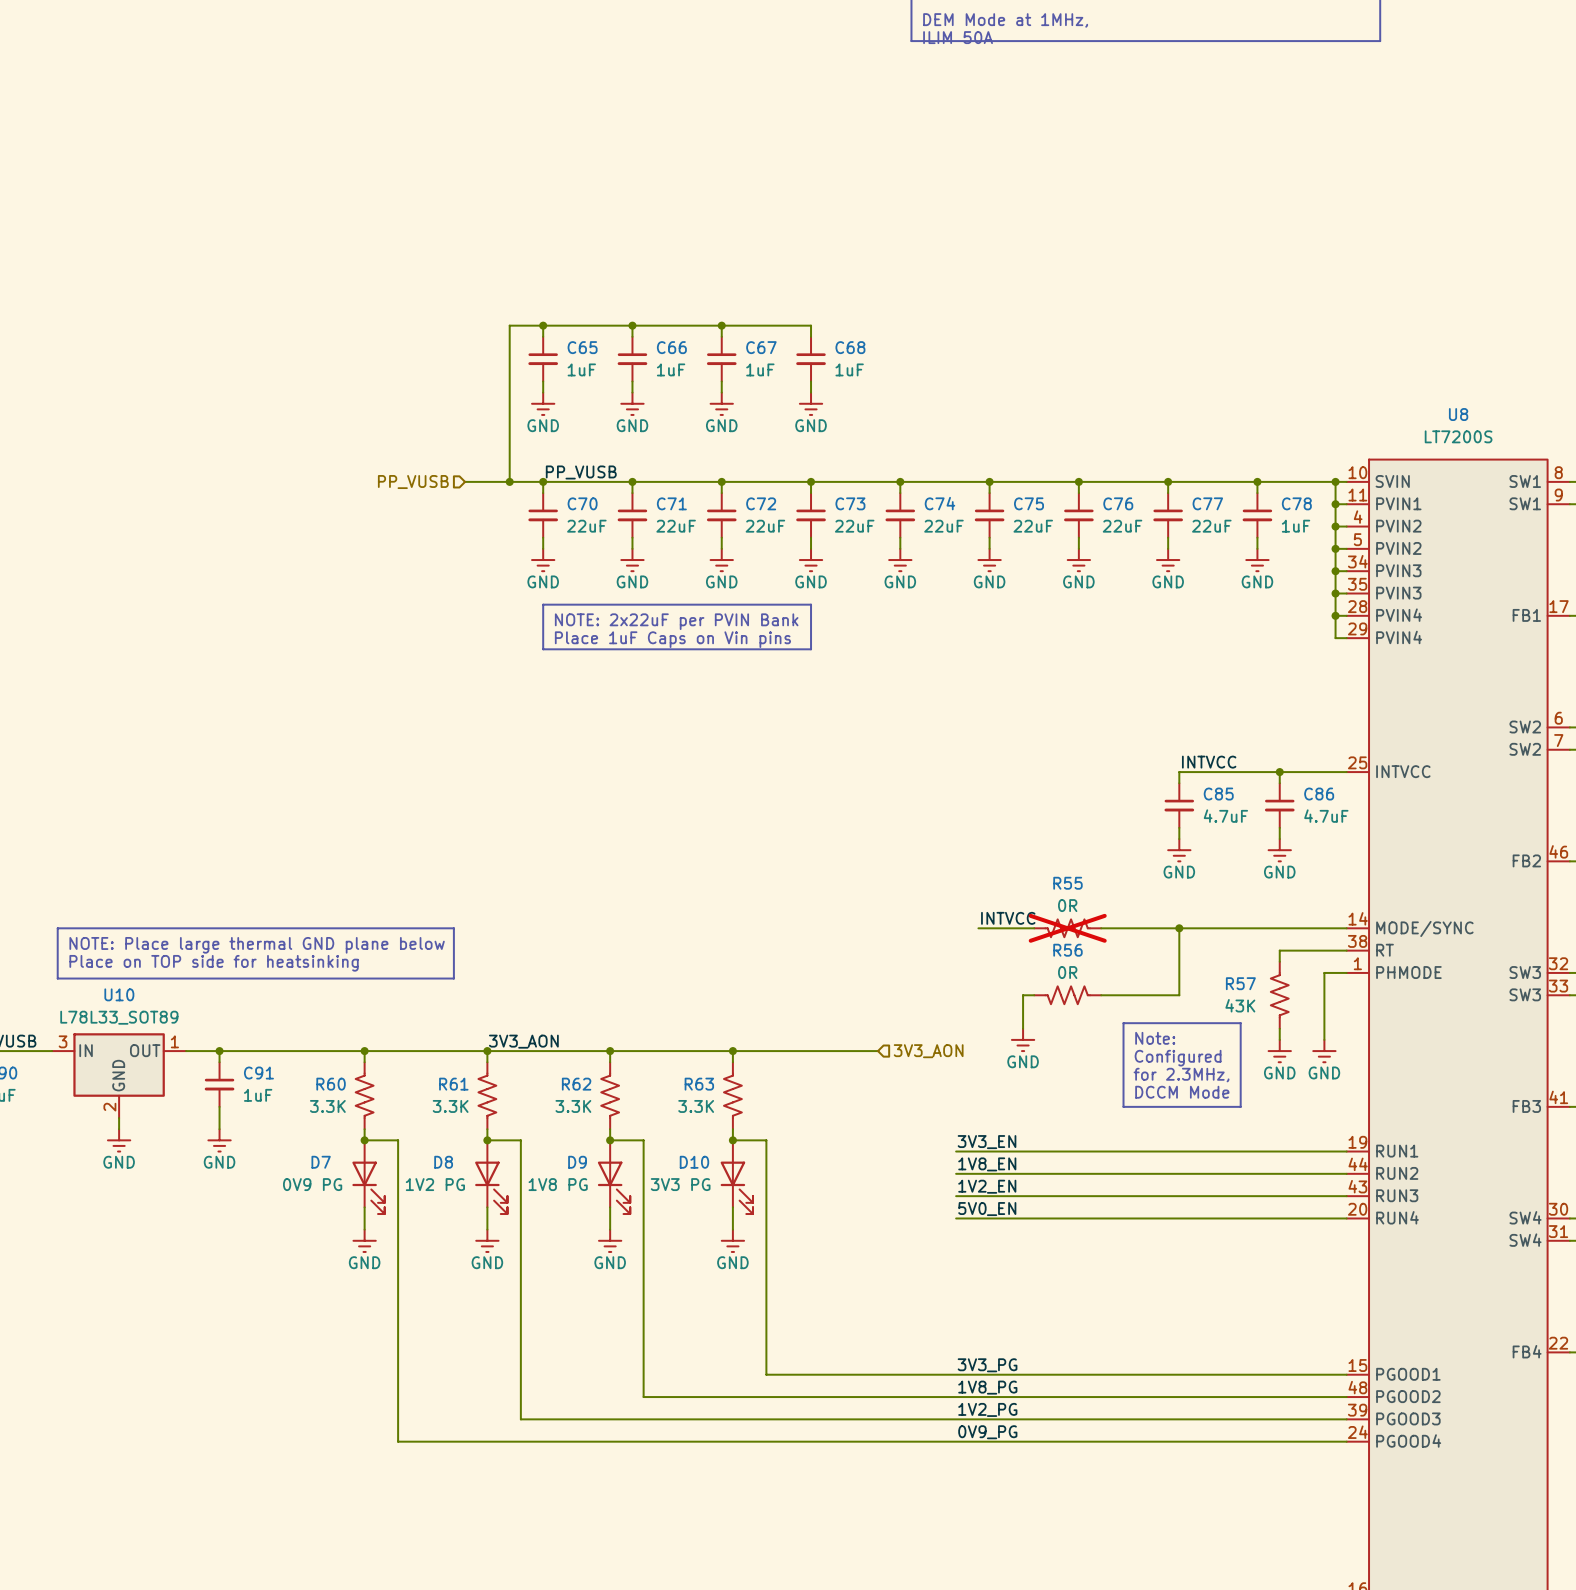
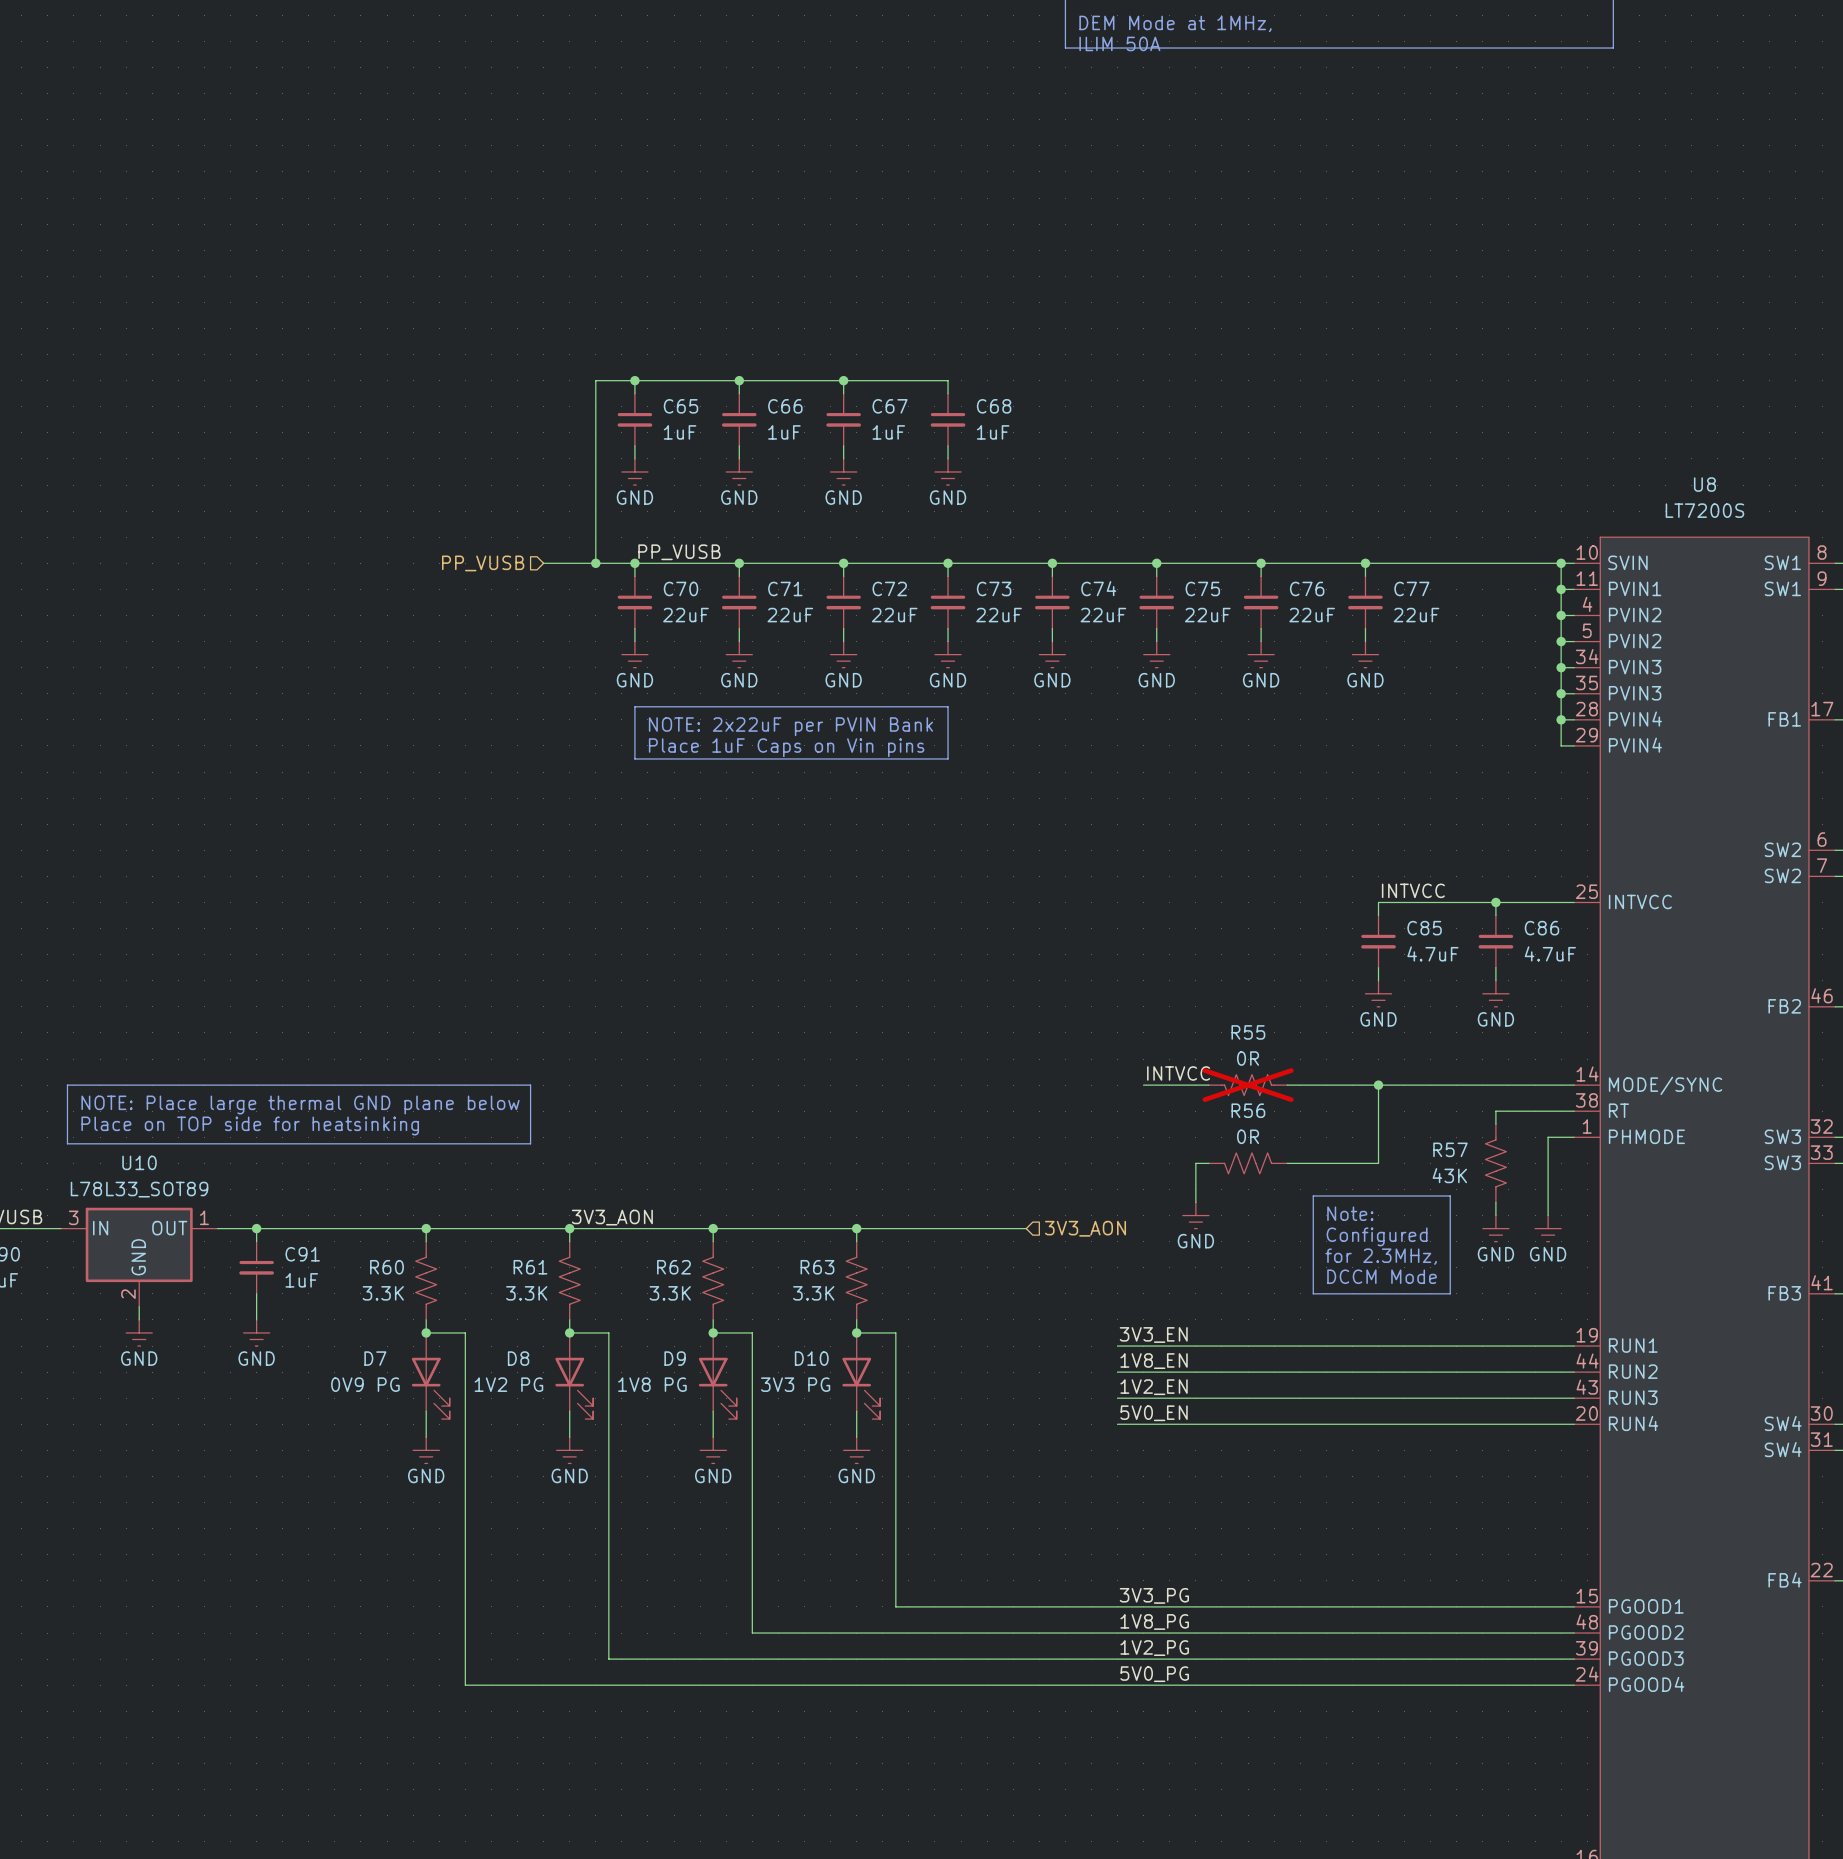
wire: (1257, 481) (1257, 493) -> none
junction: (1257, 481) -> none
C78: 1uF (1257, 515) -> none
wire: (1257, 537) (1257, 548) -> none
power symbol: GND (1257, 560) -> none
label: 0V9_PG (987, 1432) -> 5V0_PG (1154, 1674)

